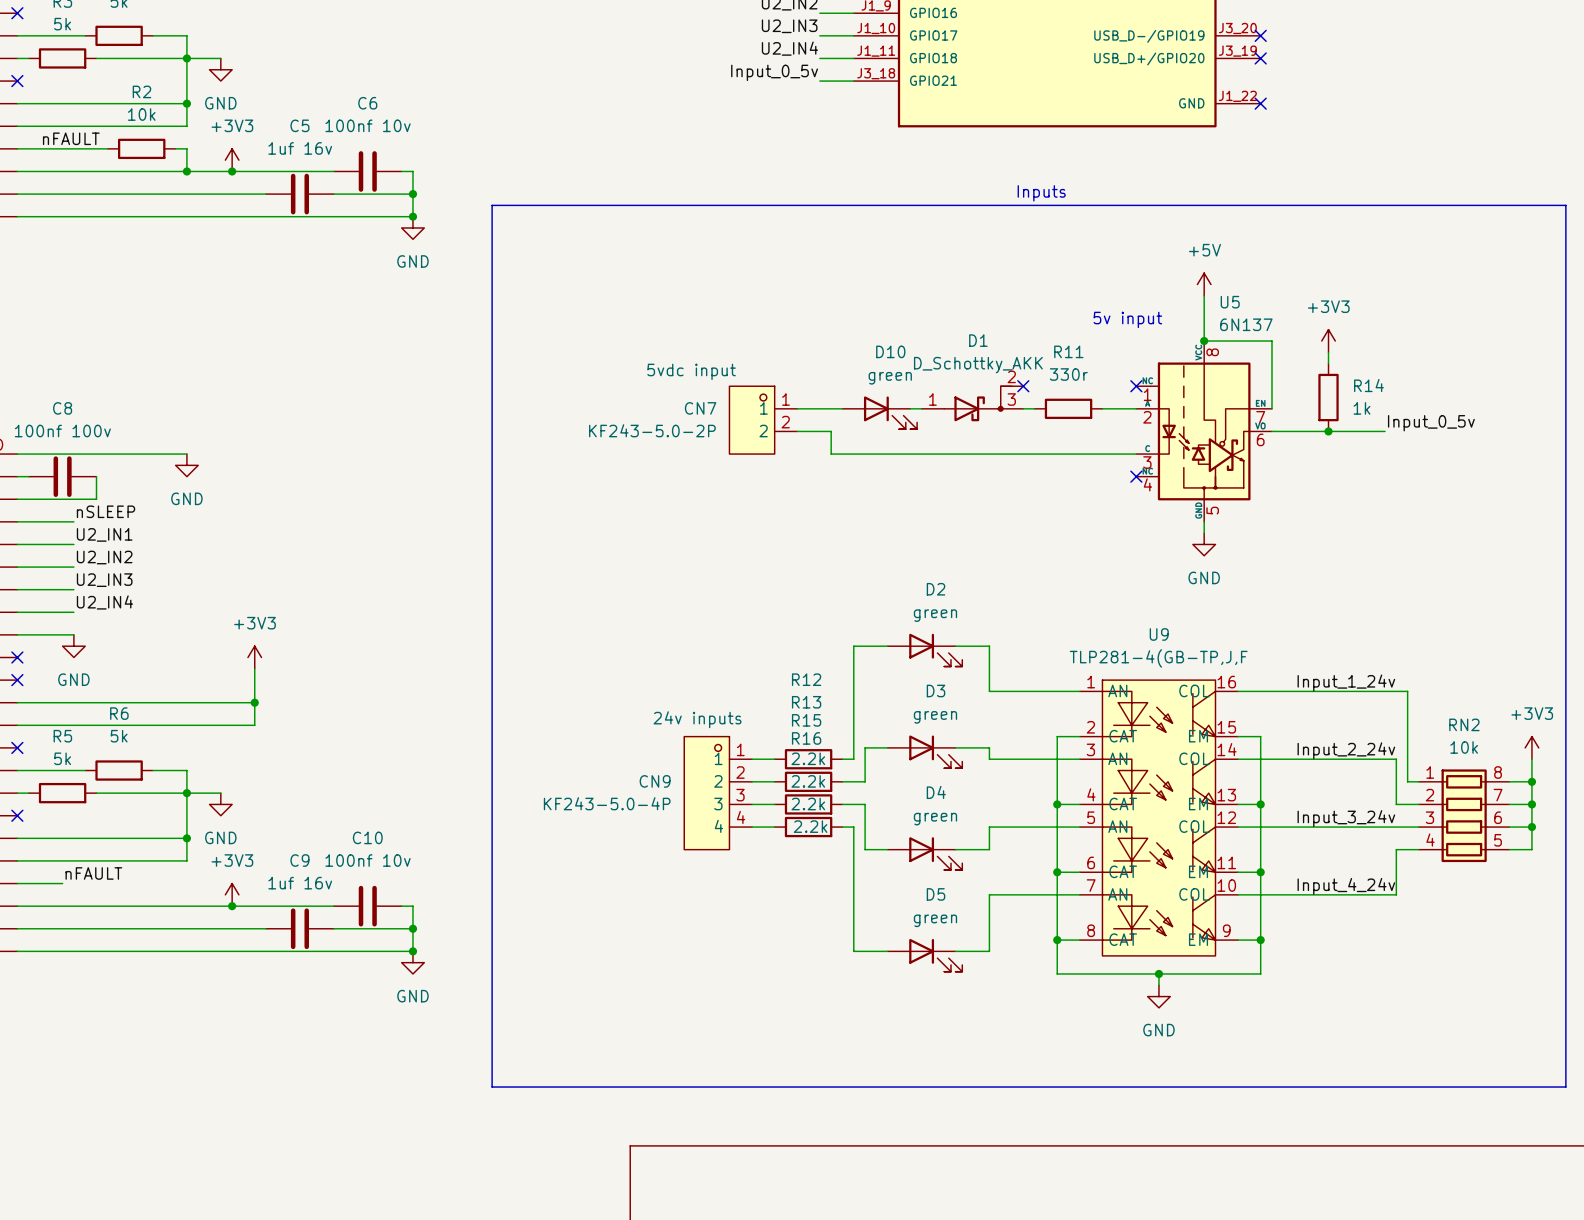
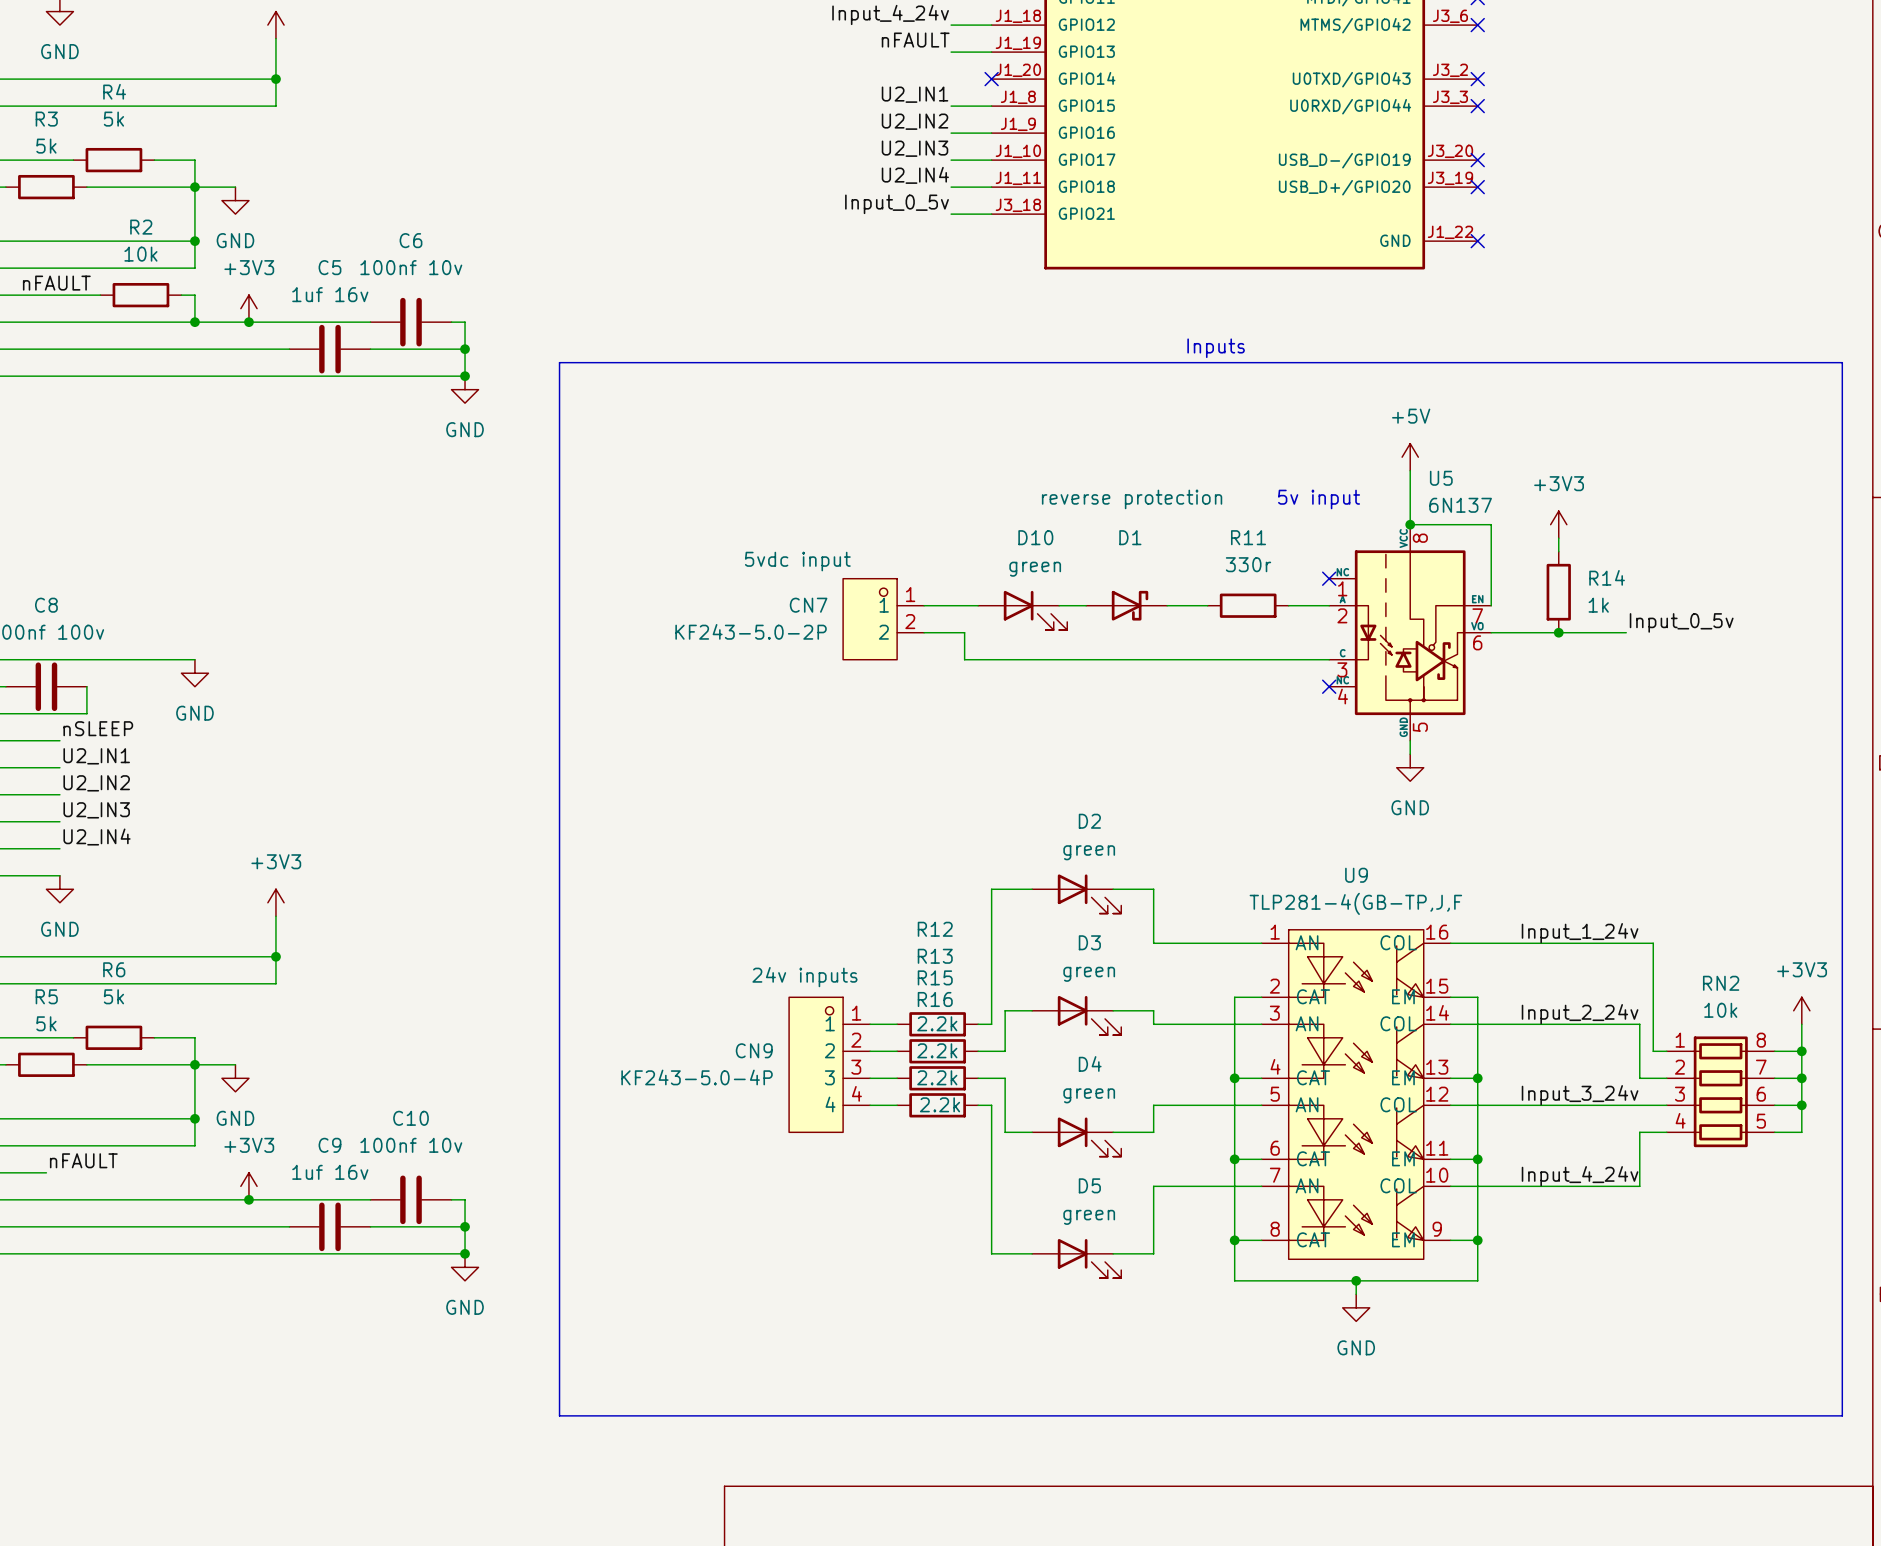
D1 value: D_Schottky_AKK (978, 365) -> reverse protection (1132, 499)
D1 symbol: [921, 386, 1024, 422] -> [1086, 590, 1168, 621]
no-connect mark: (1023, 386) -> none

